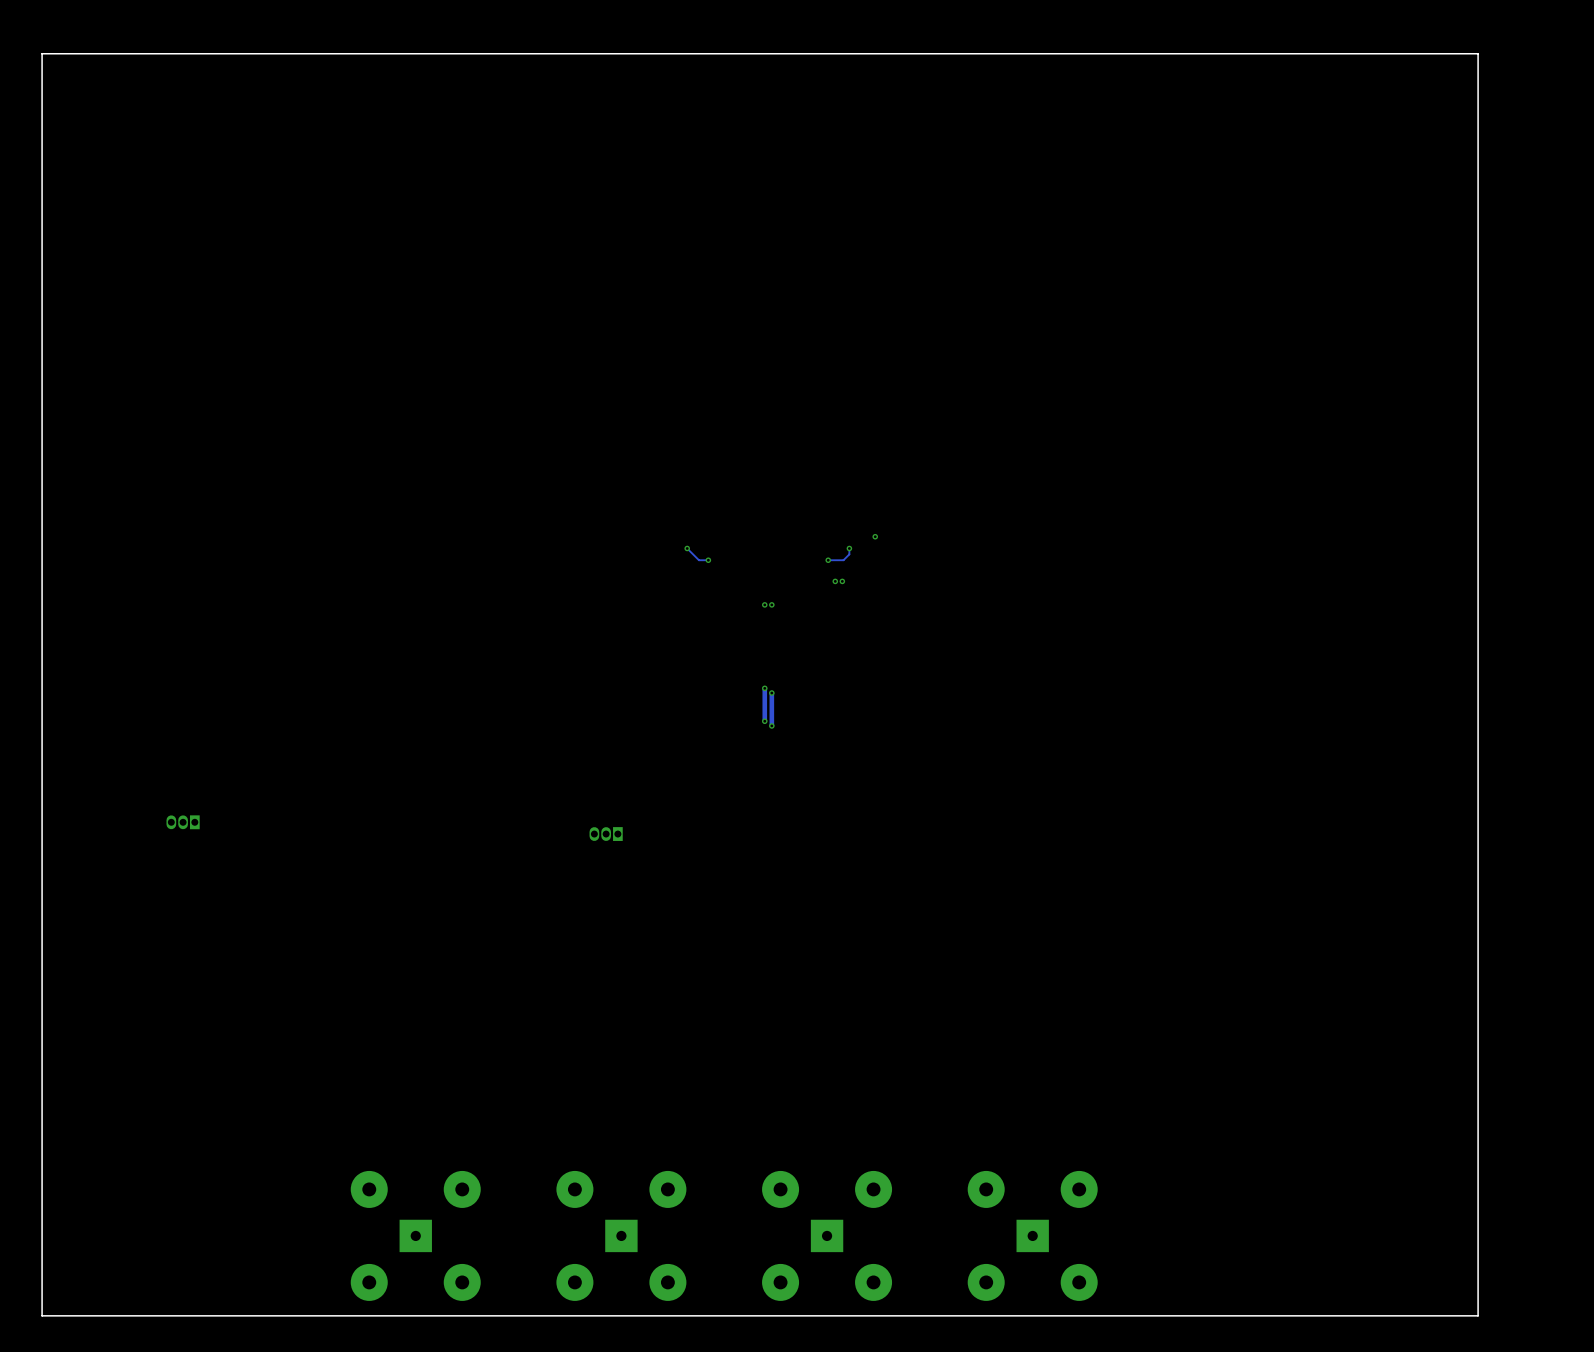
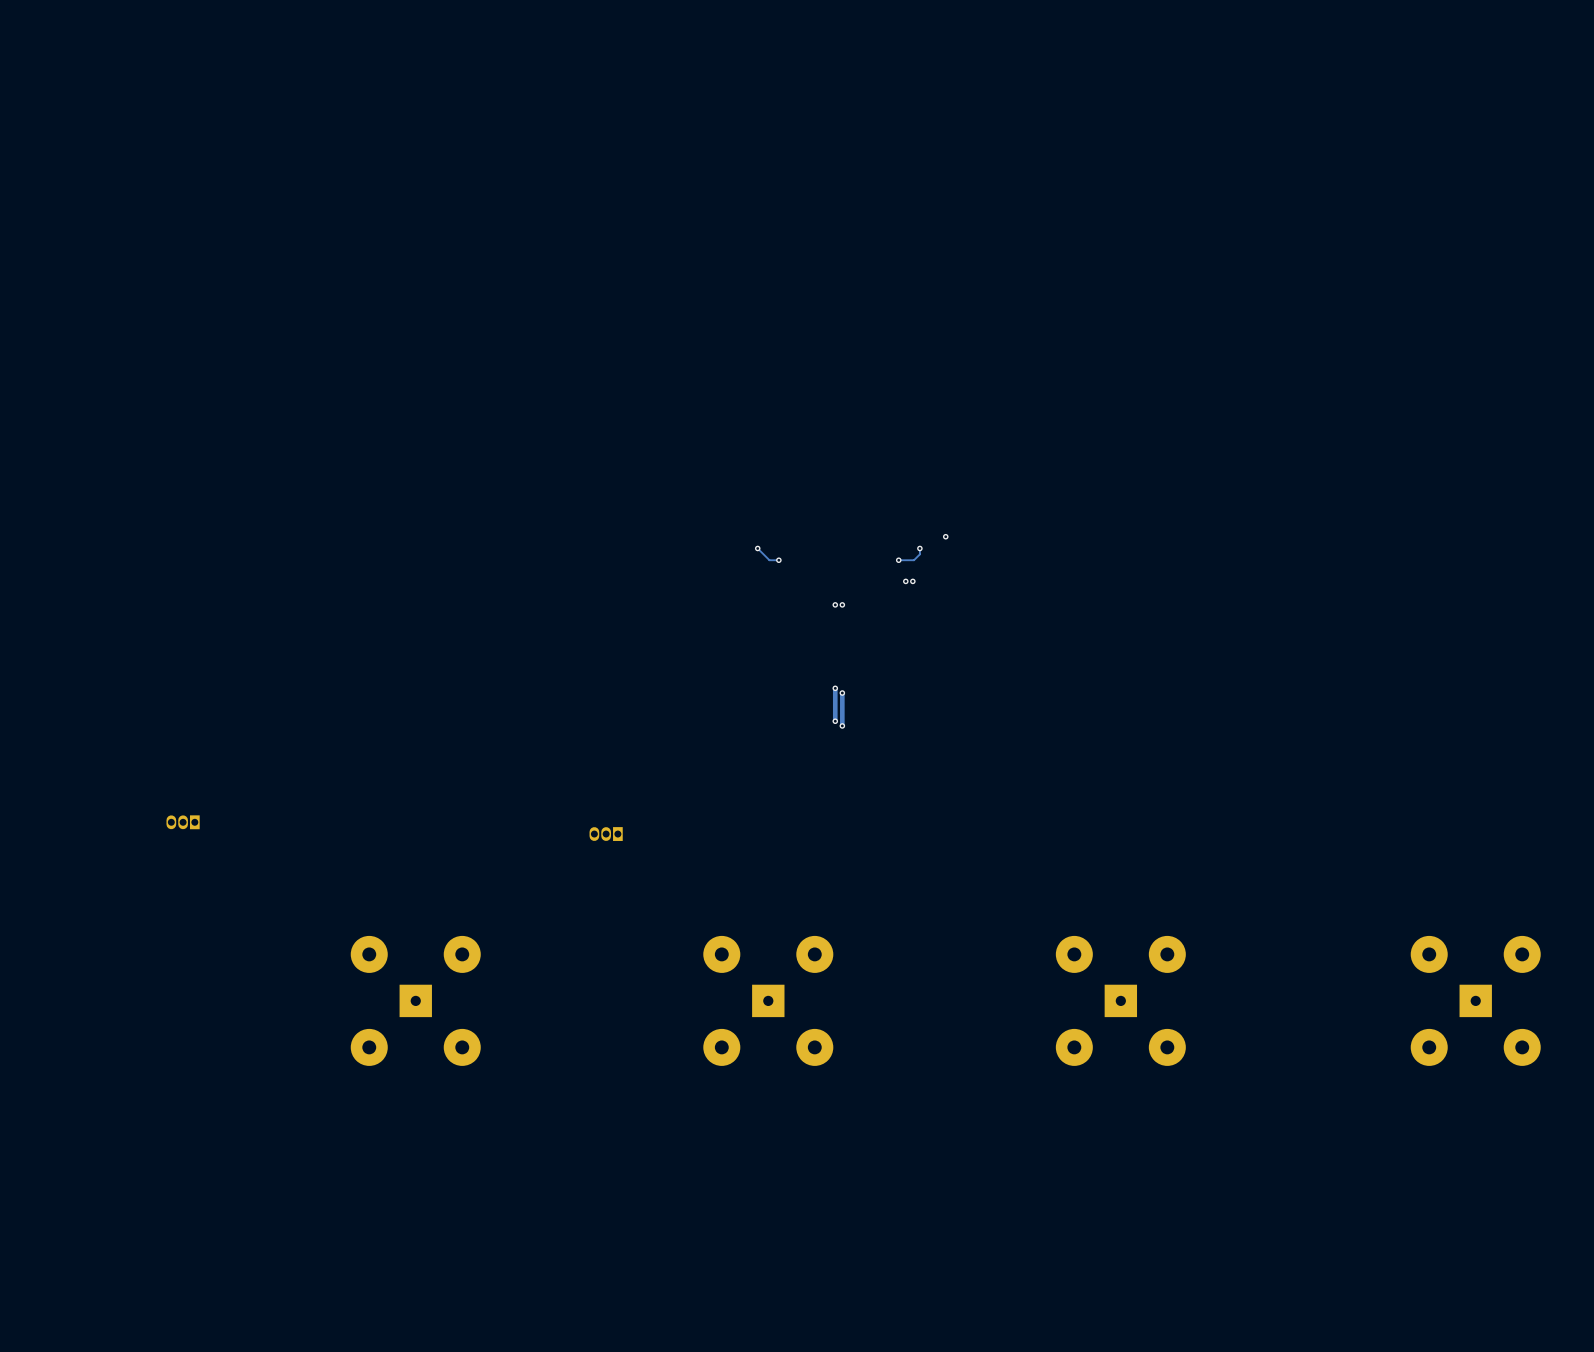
board edge: (1478, 53) (42, 53) (42, 1315) (1478, 1315) (1478, 53) -> none
via: (875, 536) -> none
via: none -> (945, 536)
track: (687, 548) (698, 560) (708, 560) -> (757, 548) (769, 560) (778, 560)
via: (687, 548) -> none
via: none -> (757, 548)
track: (849, 548) (849, 554) (843, 560) (828, 560) -> (919, 548) (919, 554) (914, 560) (898, 560)
via: (849, 548) -> none
via: none -> (919, 548)
via: (708, 560) -> none
via: none -> (778, 560)
via: (828, 560) -> none
via: none -> (898, 560)
via: (835, 581) -> none
via: (842, 581) -> none
via: none -> (905, 581)
via: none -> (912, 581)
via: (764, 604) -> none
via: (771, 604) -> none
via: none -> (835, 604)
via: none -> (842, 604)
track: (764, 688) (764, 721) -> (835, 688) (835, 721)
via: (764, 688) -> none
via: none -> (835, 688)
track: (771, 693) (771, 725) -> (842, 693) (842, 725)
via: (771, 693) -> none
via: none -> (842, 693)
via: (764, 721) -> none
via: none -> (835, 721)
via: (771, 725) -> none
via: none -> (842, 725)
part: none -> (415, 1000)
part: none -> (768, 1000)
part: none -> (1120, 1000)
part: none -> (1475, 1000)
part: (415, 1235) -> none
part: (621, 1235) -> none
part: (827, 1235) -> none
part: (1032, 1235) -> none

